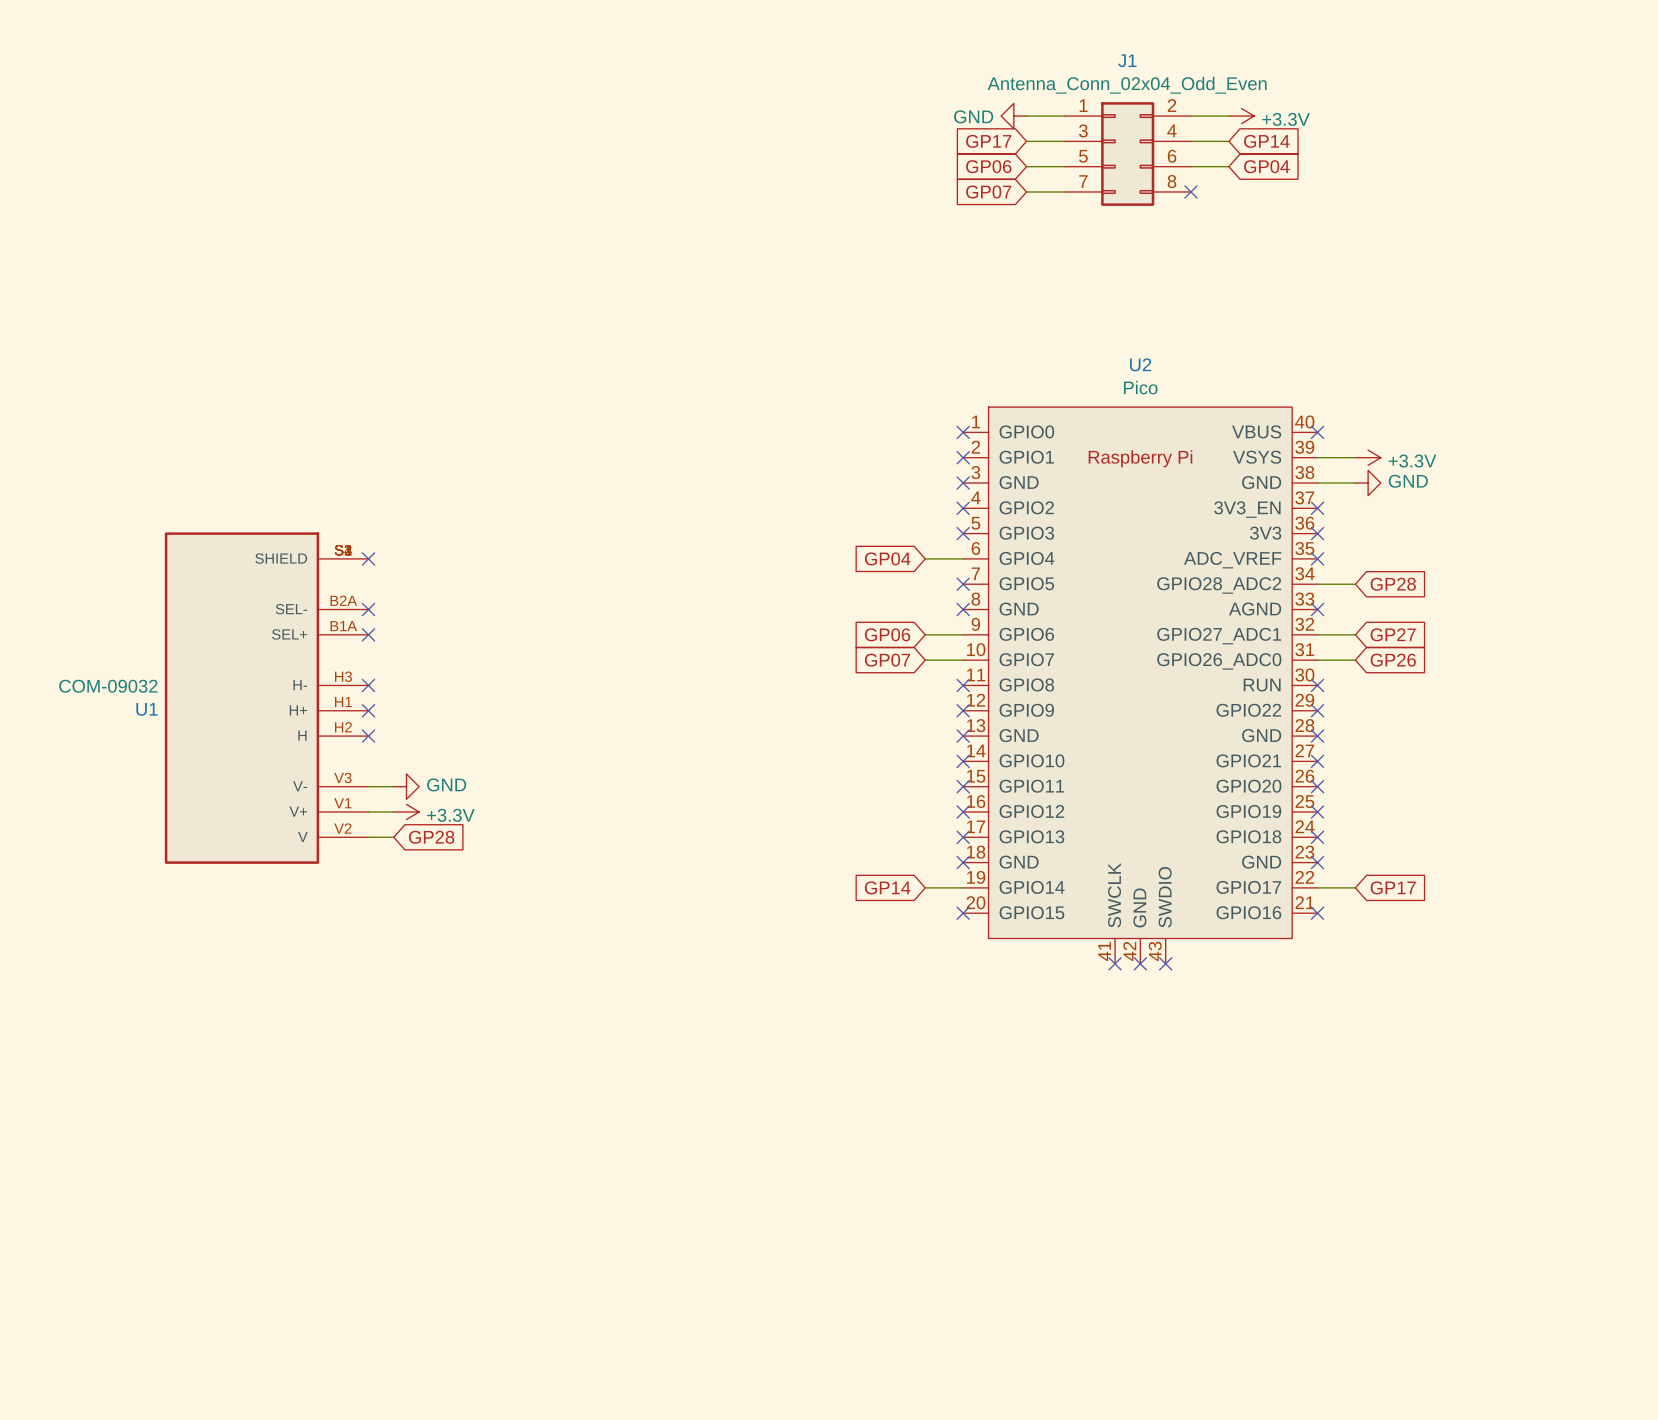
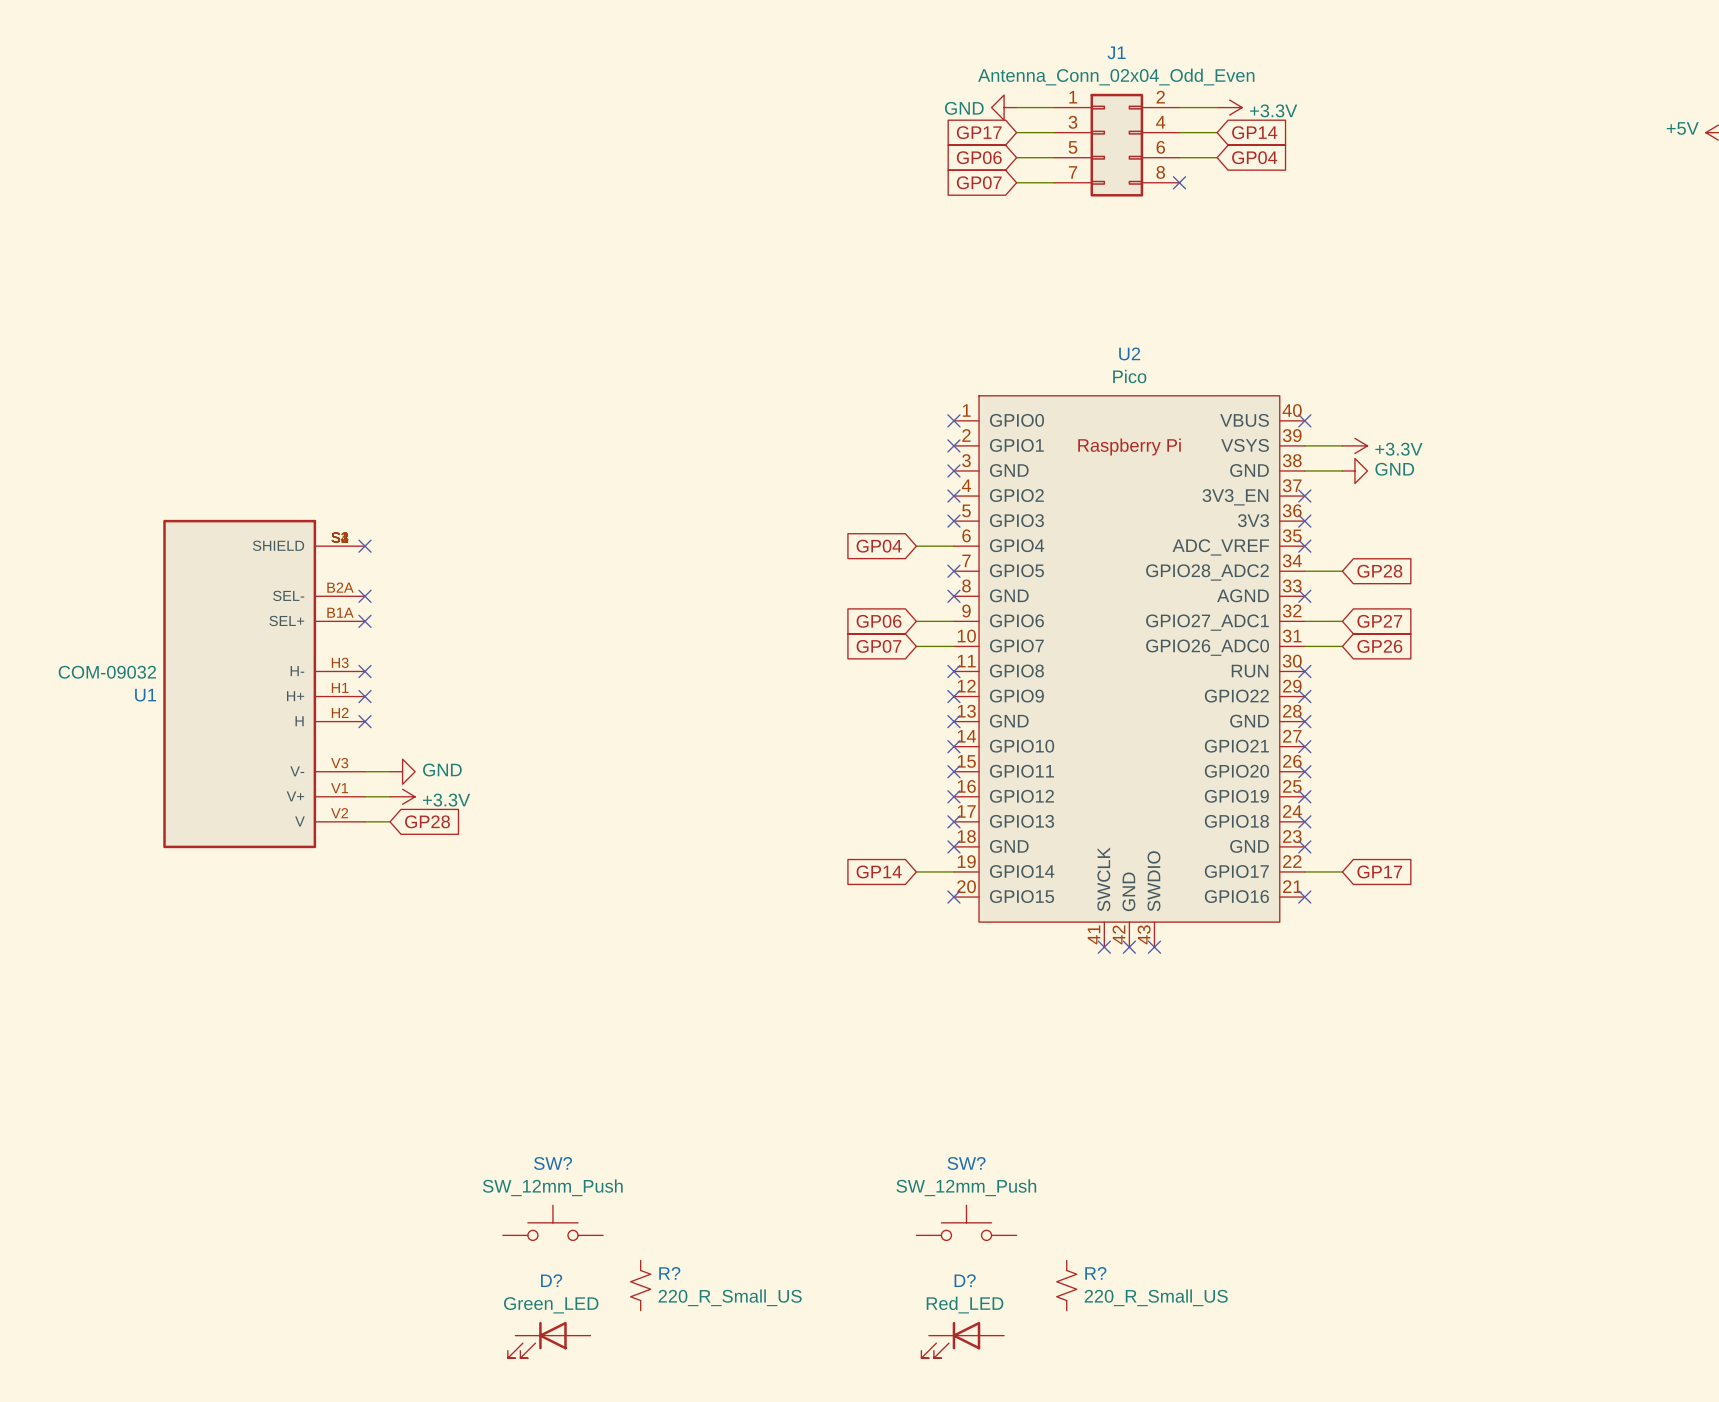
SW?: none -> SW_12mm_Push (552, 1222)
SW?: none -> SW_12mm_Push (966, 1222)
R?: none -> 220_R_Small_US (640, 1285)
R?: none -> 220_R_Small_US (1066, 1285)
D?: none -> Green_LED (549, 1340)
D?: none -> Red_LED (962, 1340)

